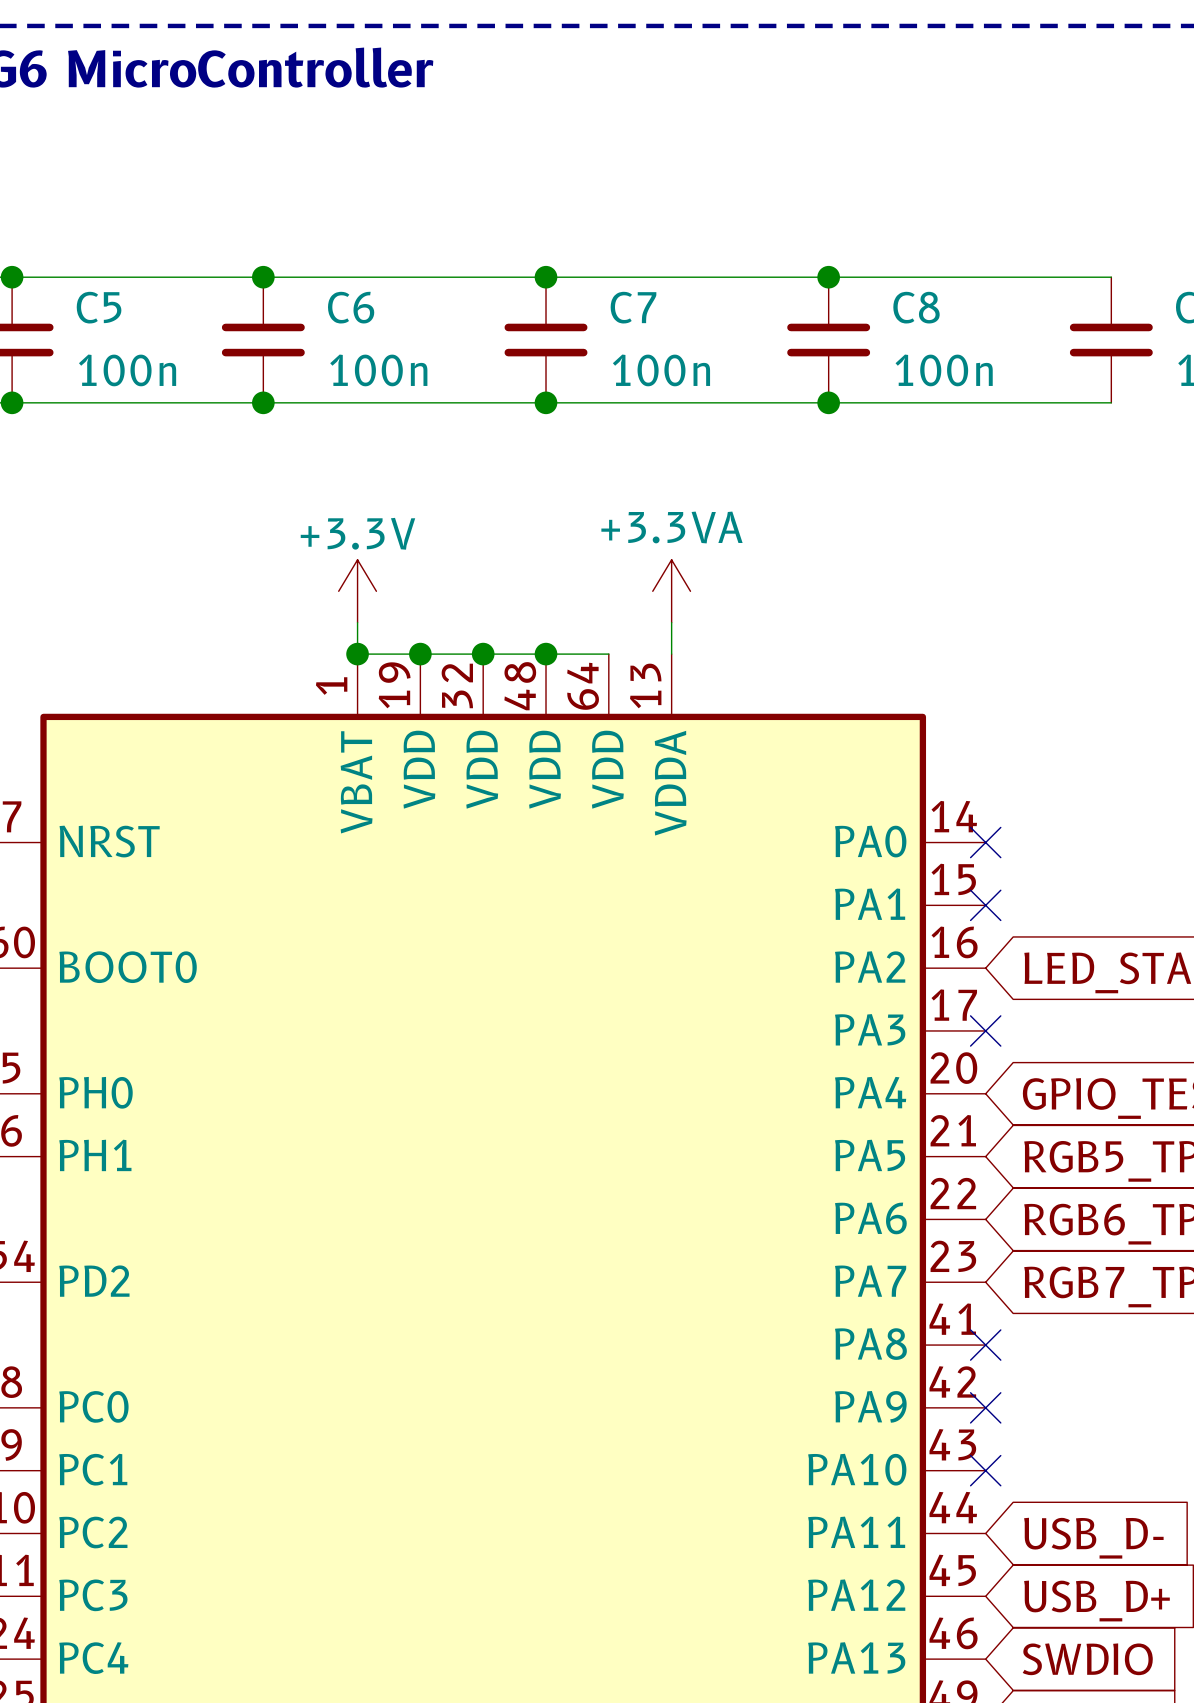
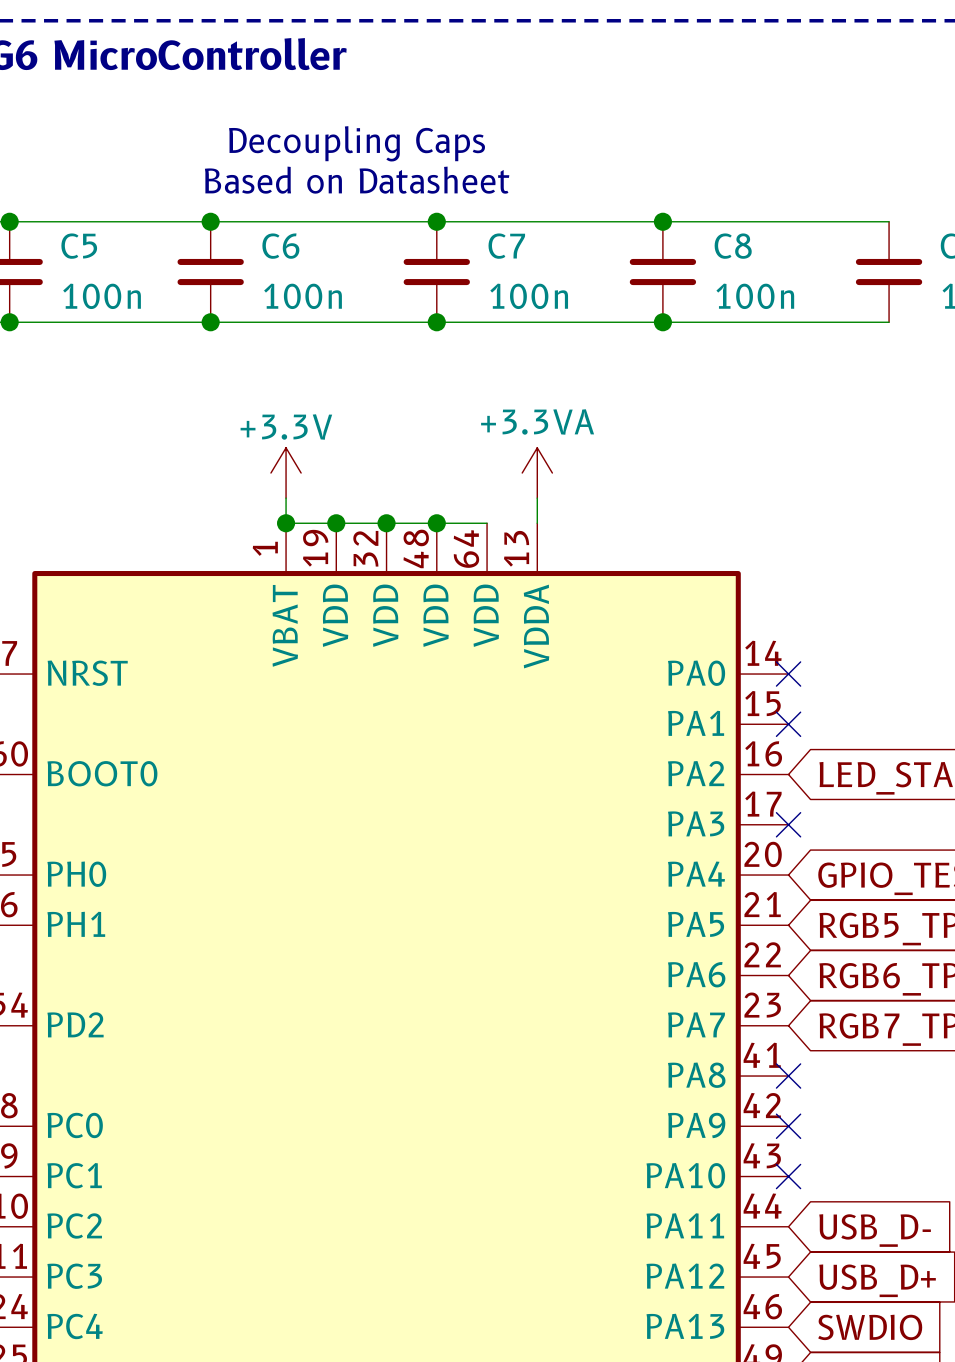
text: none -> Decoupling Caps (357, 143)
text: none -> Based on Datasheet (357, 180)

